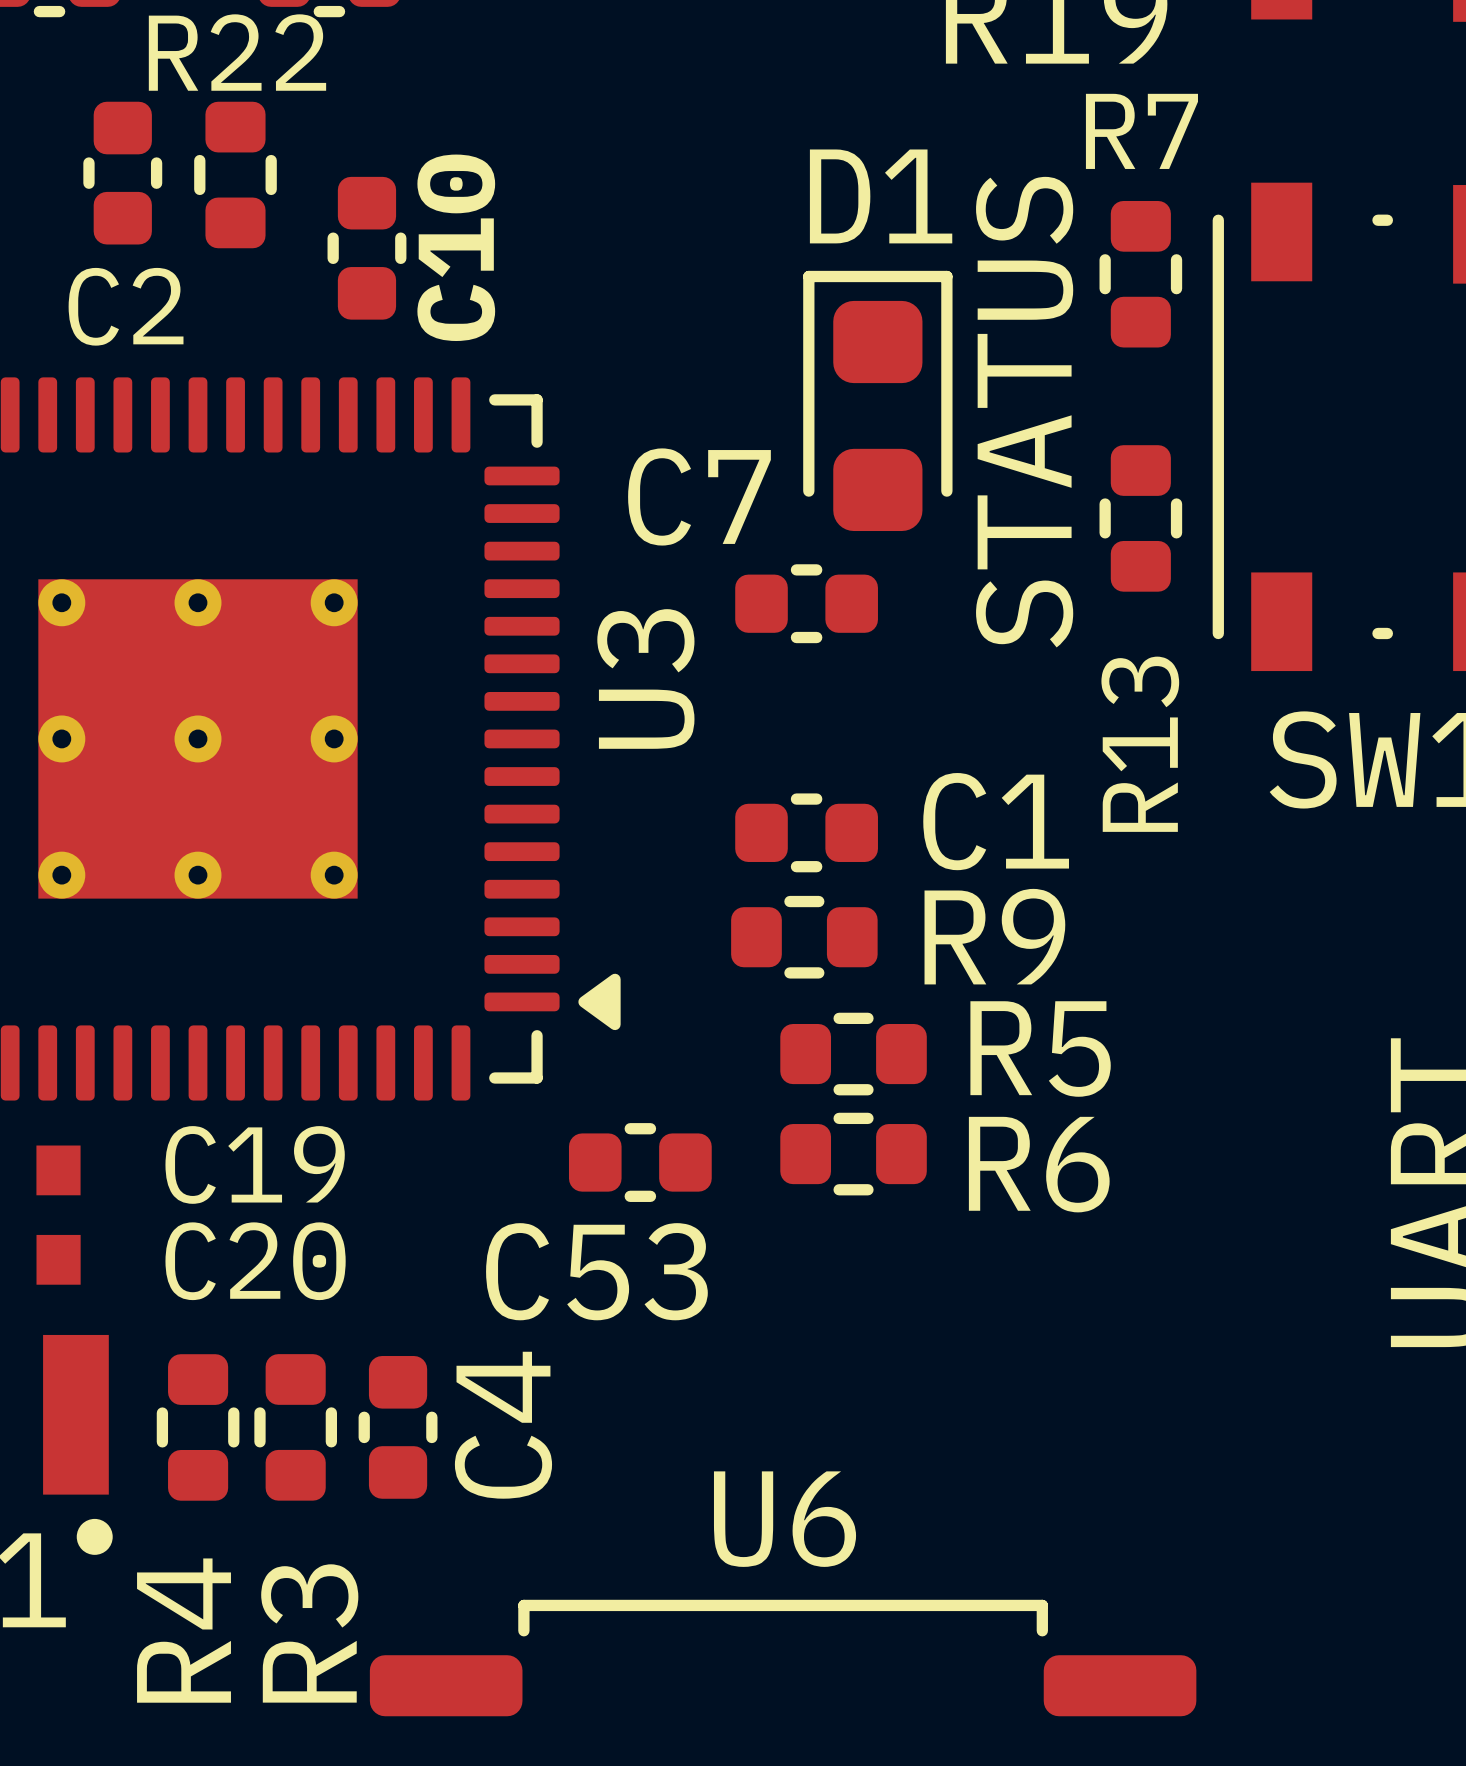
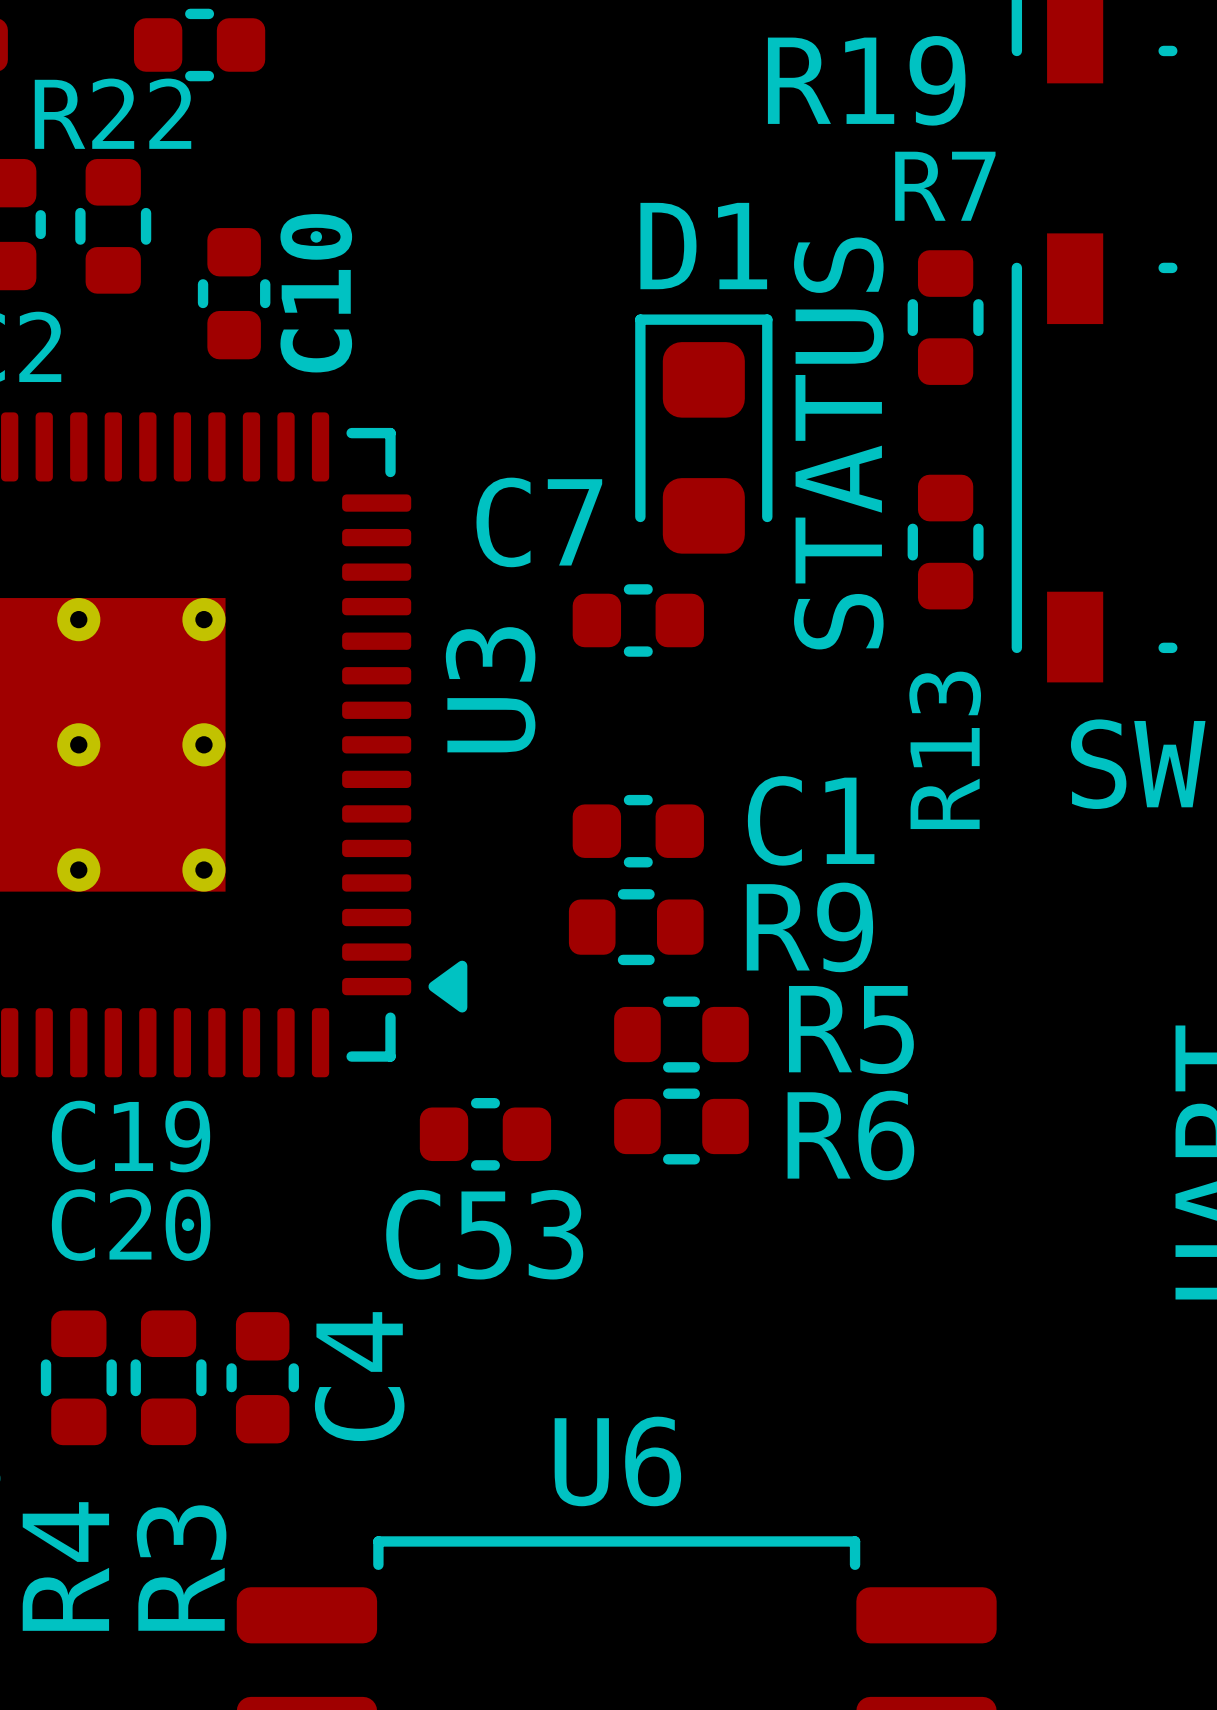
C53 name position: C53 (596, 1271) -> C53 (484, 1234)

